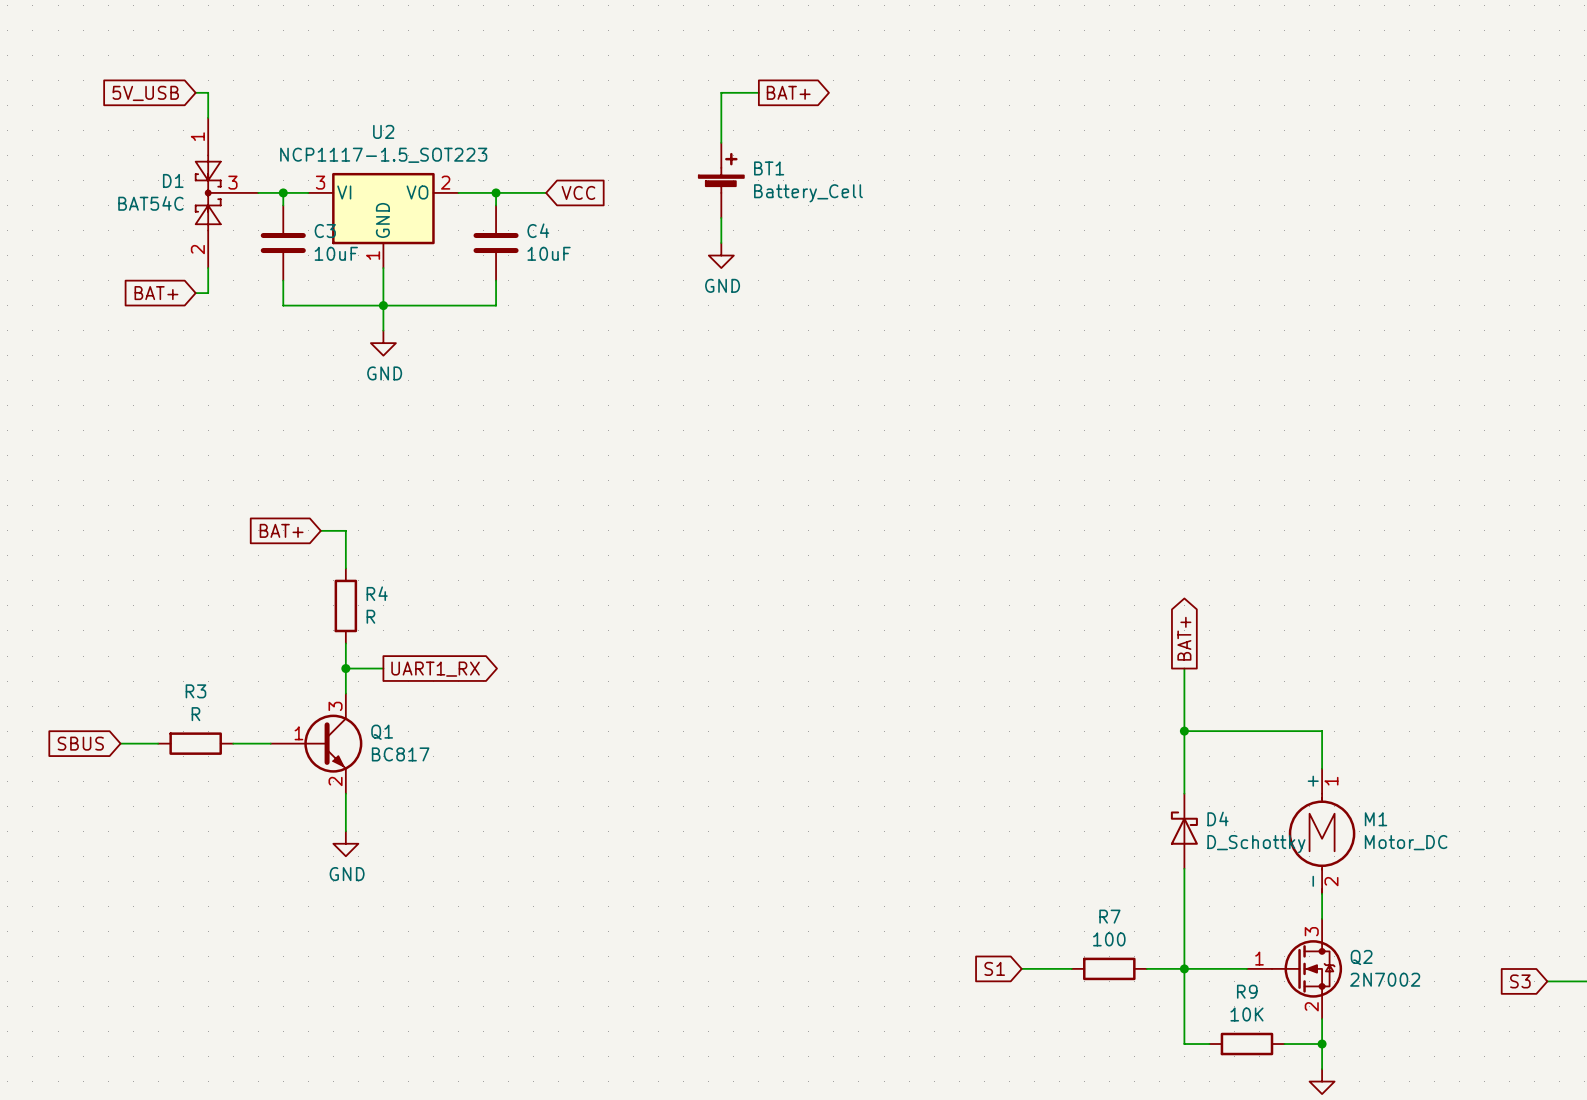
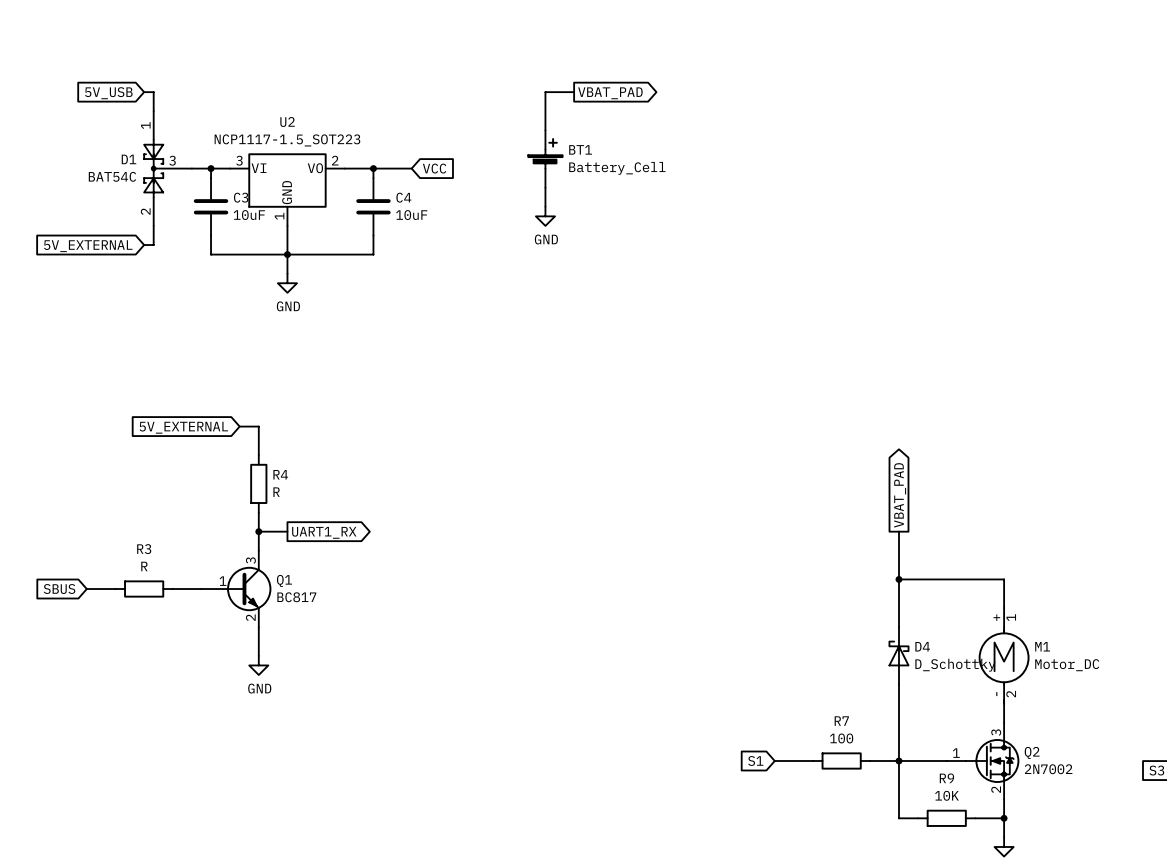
global label: BAT+ (788, 92) -> VBAT_PAD (610, 93)
global label: BAT+ (156, 293) -> 5V_EXTERNAL (88, 246)
global label: BAT+ (281, 530) -> 5V_EXTERNAL (183, 427)
global label: BAT+ (1184, 638) -> VBAT_PAD (900, 495)

